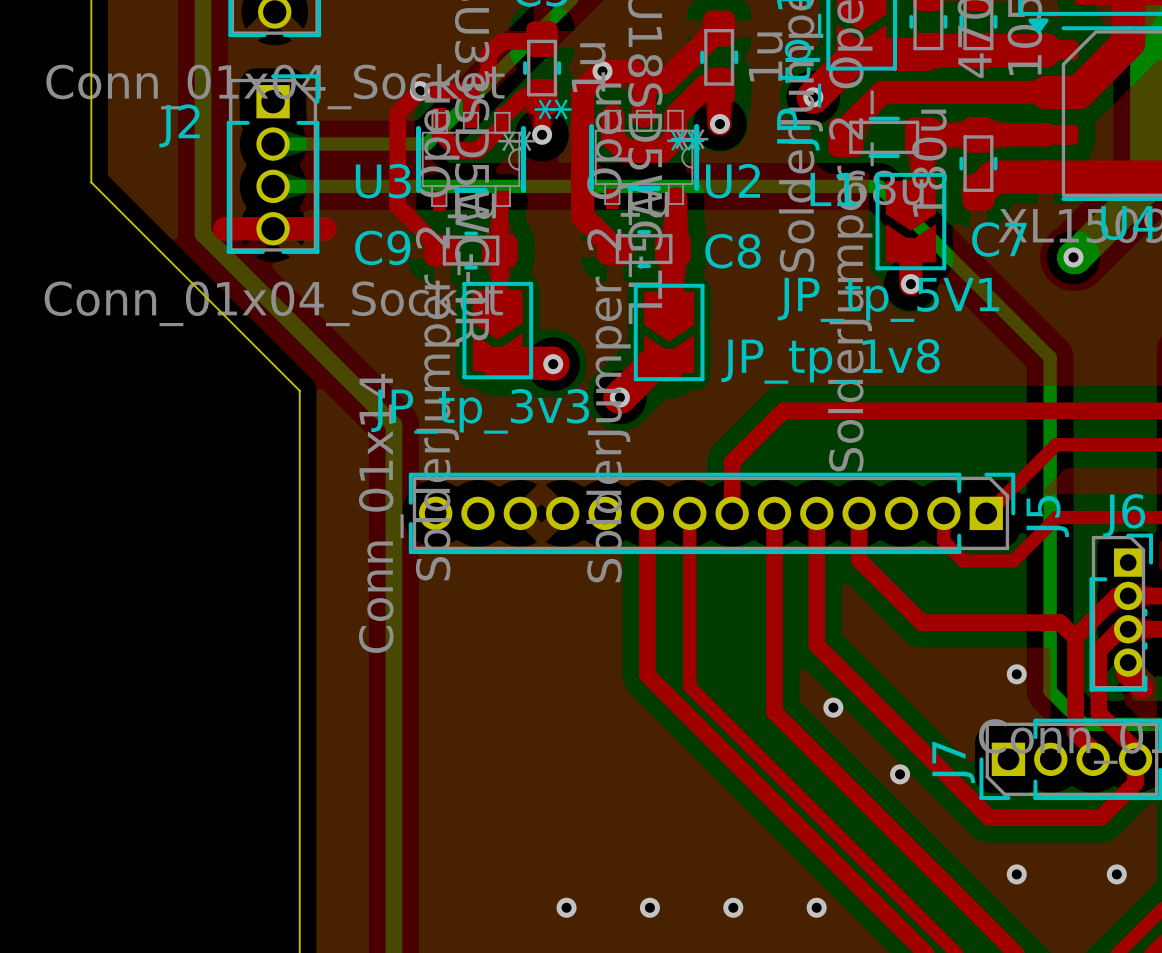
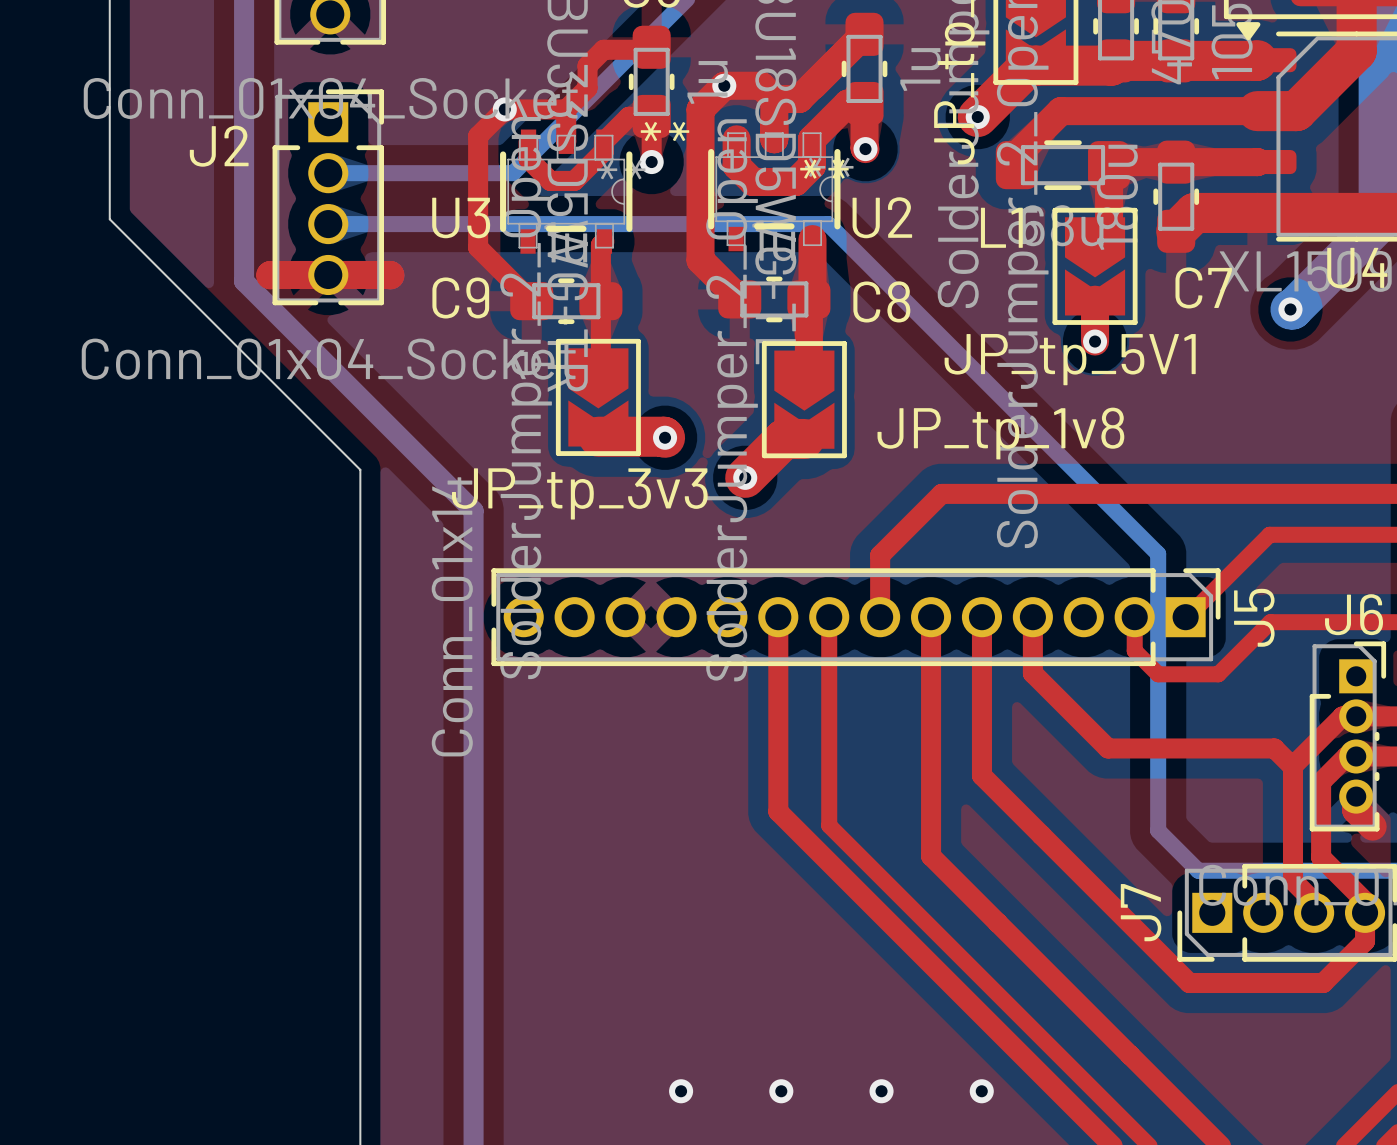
bottom track: (688, 186) (879, 186) (1050, 357) (1050, 690) (1083, 724) -> (828, 224) (1158, 554) (1158, 830) (1198, 870) (1302, 870)
via: (1016, 674) -> none
via: (833, 707) -> none
via: (900, 774) -> none
via: (1016, 874) -> none
via: (1116, 874) -> none

